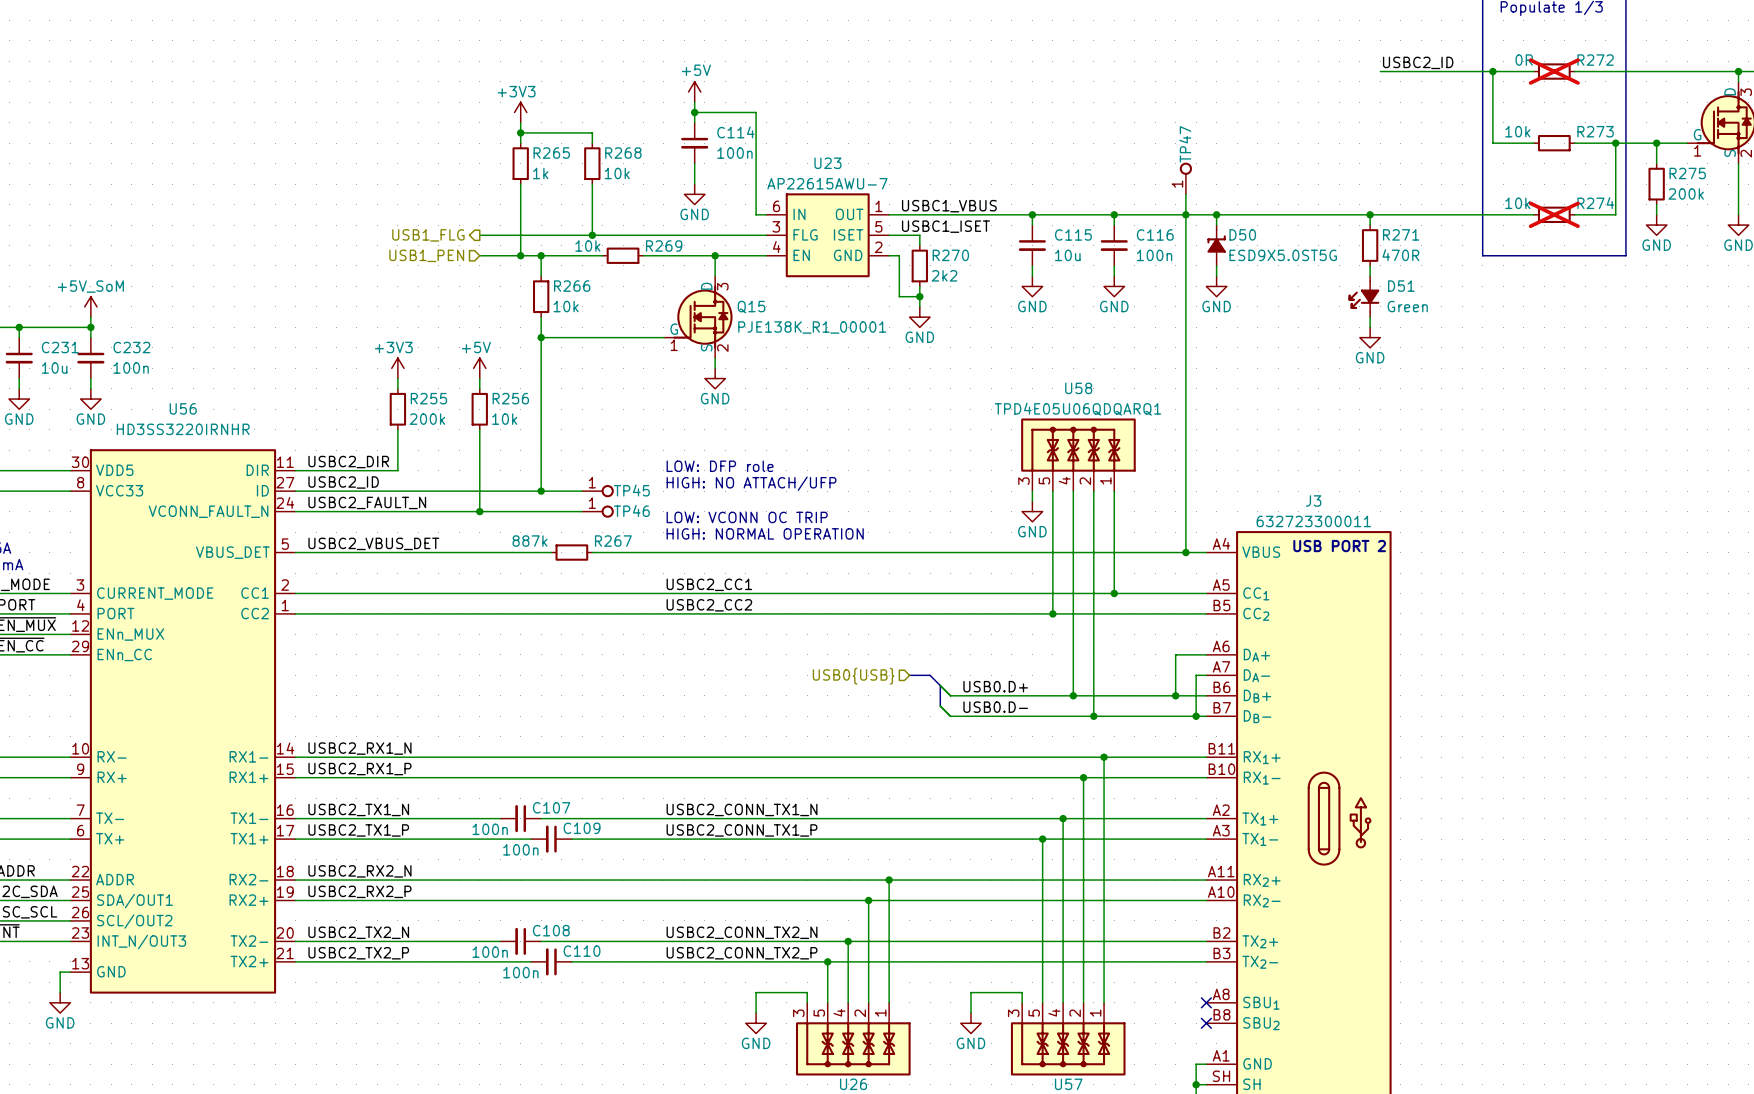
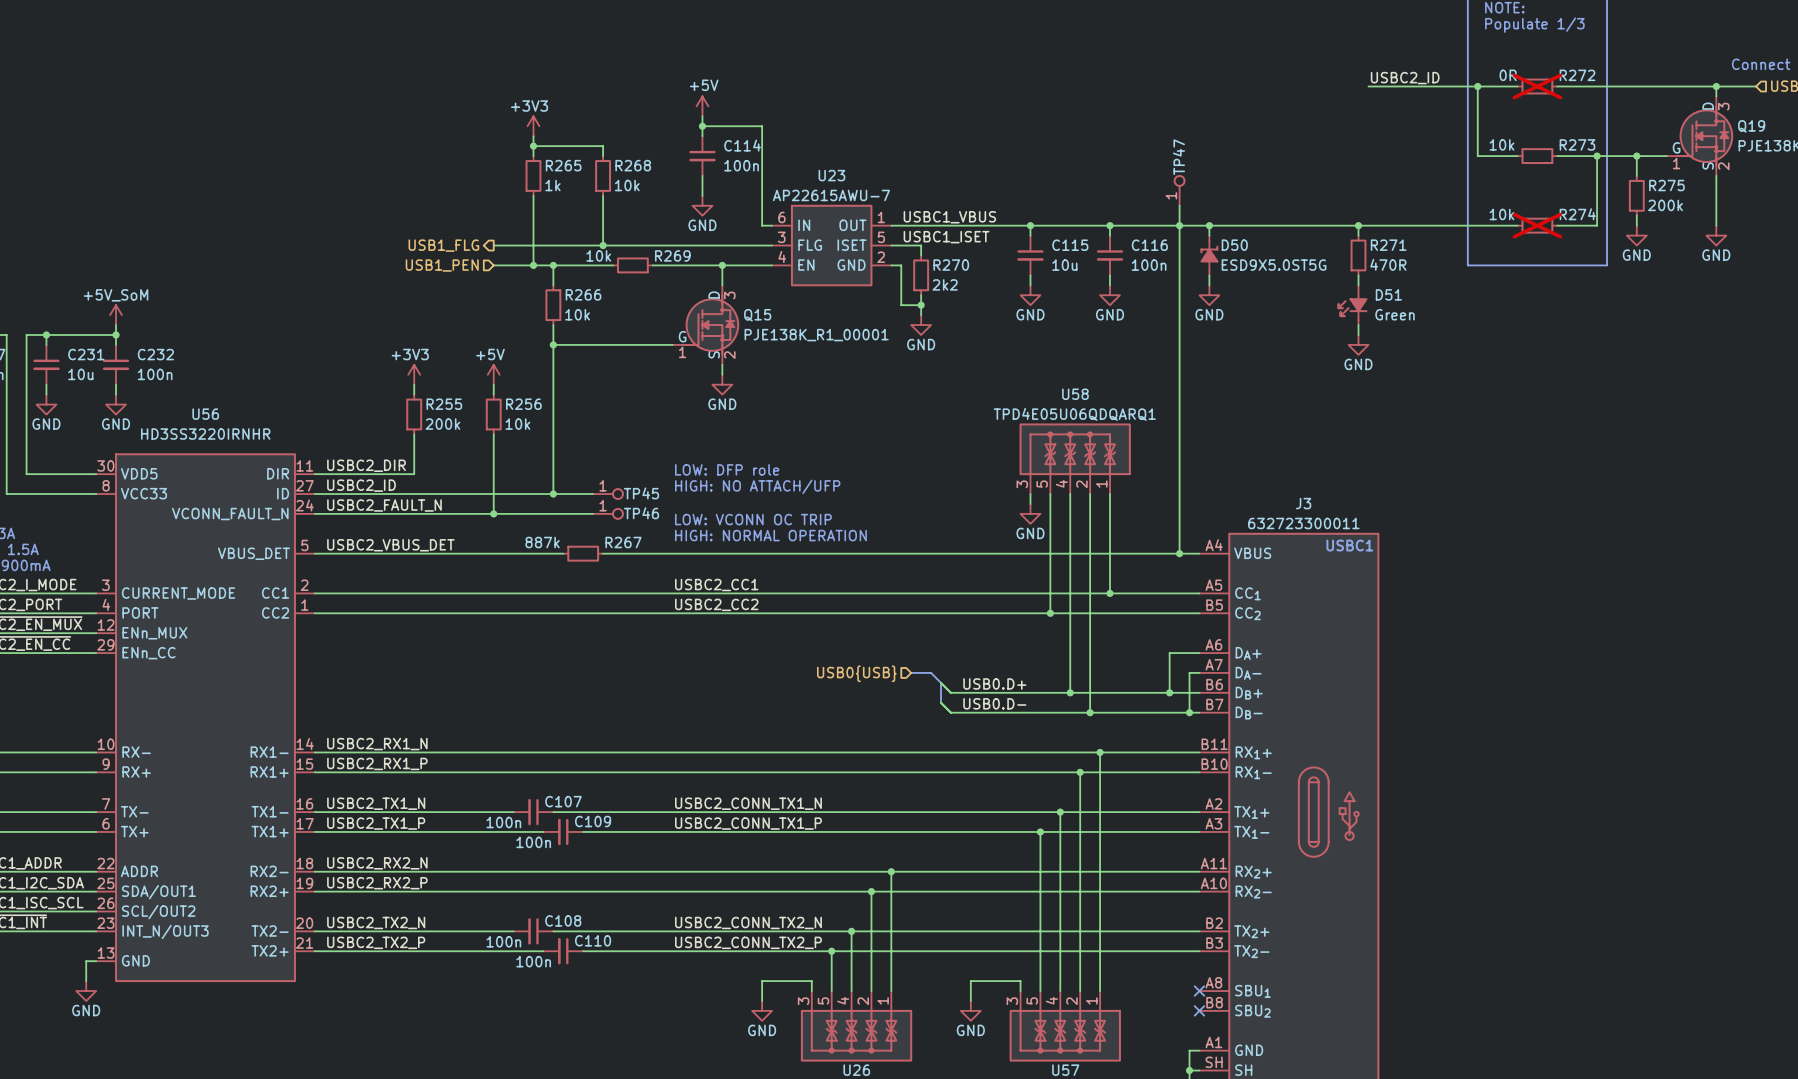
text: USB PORT 2 (1339, 546) -> USBC1 (1349, 545)

